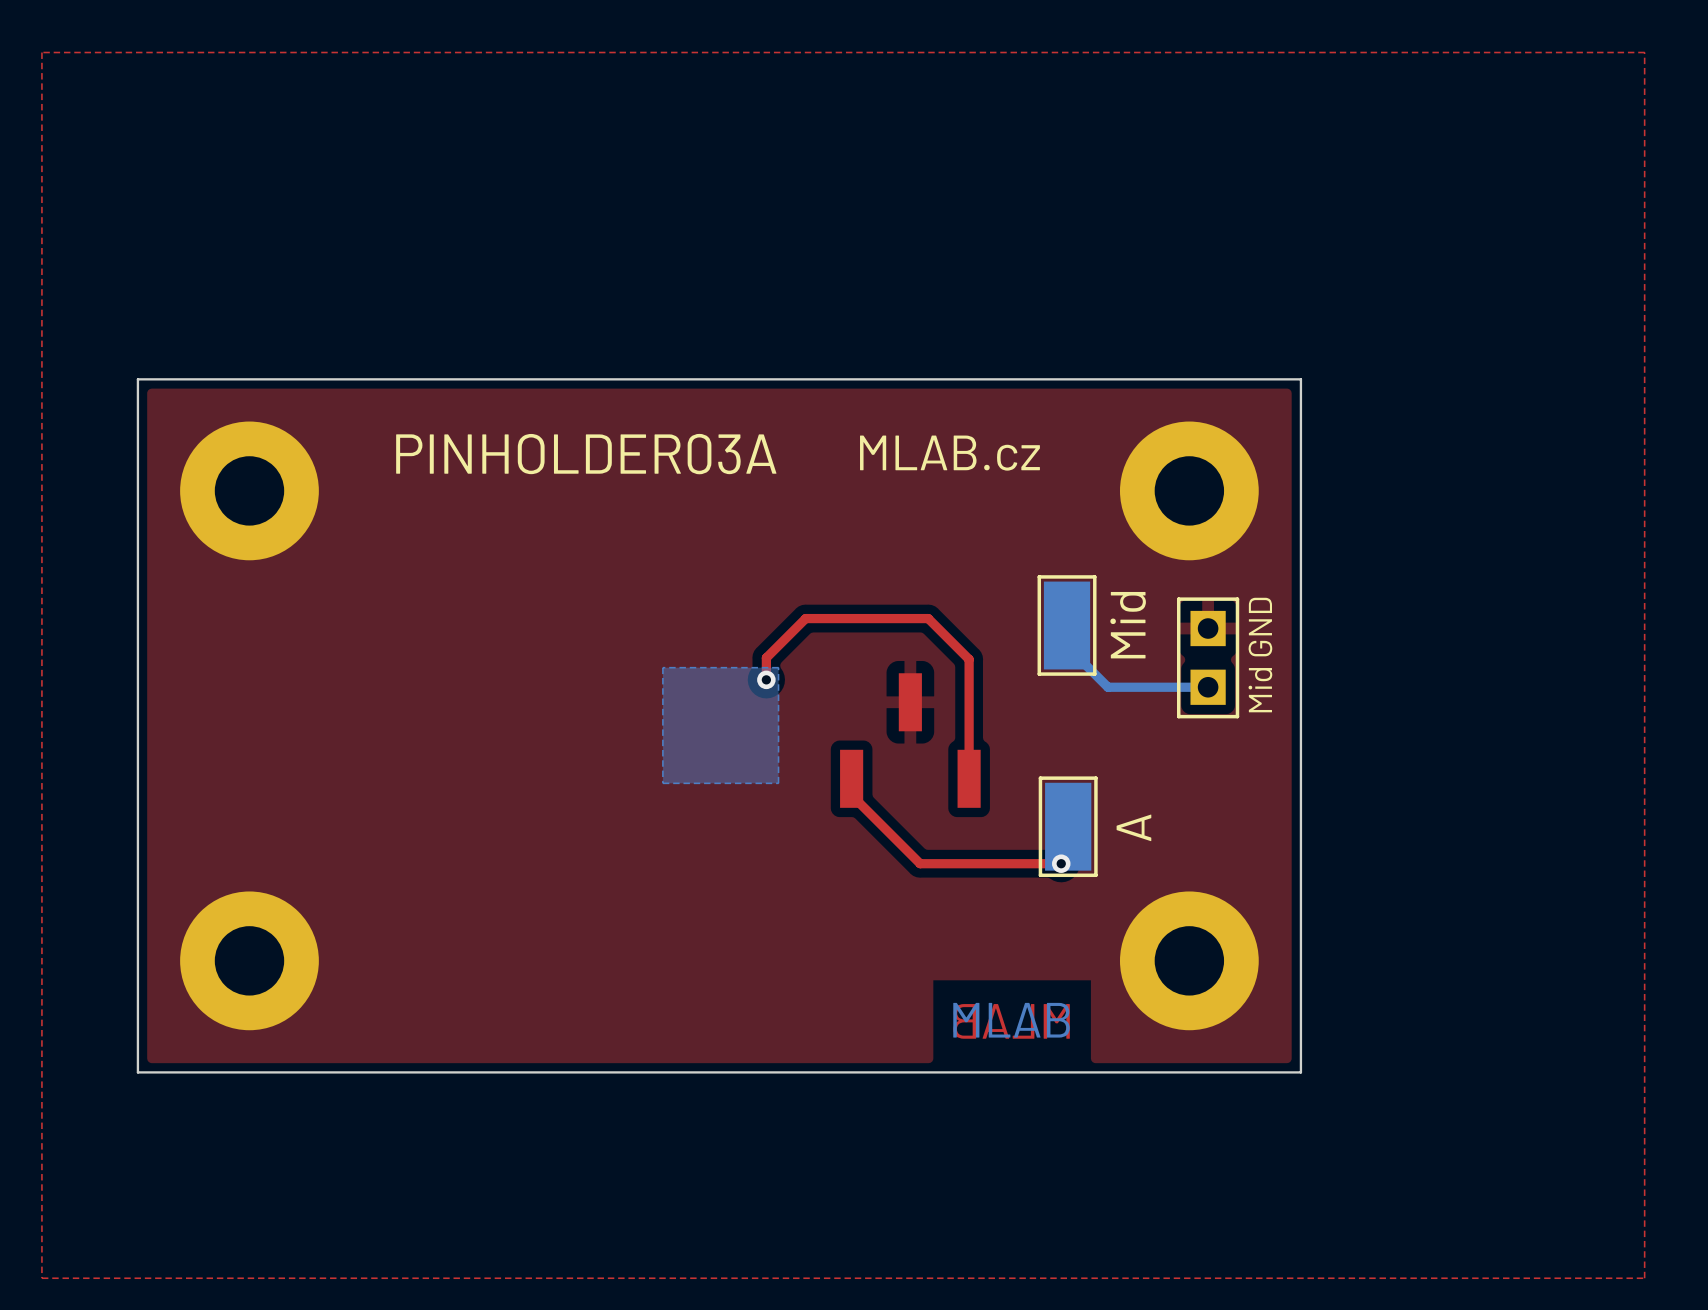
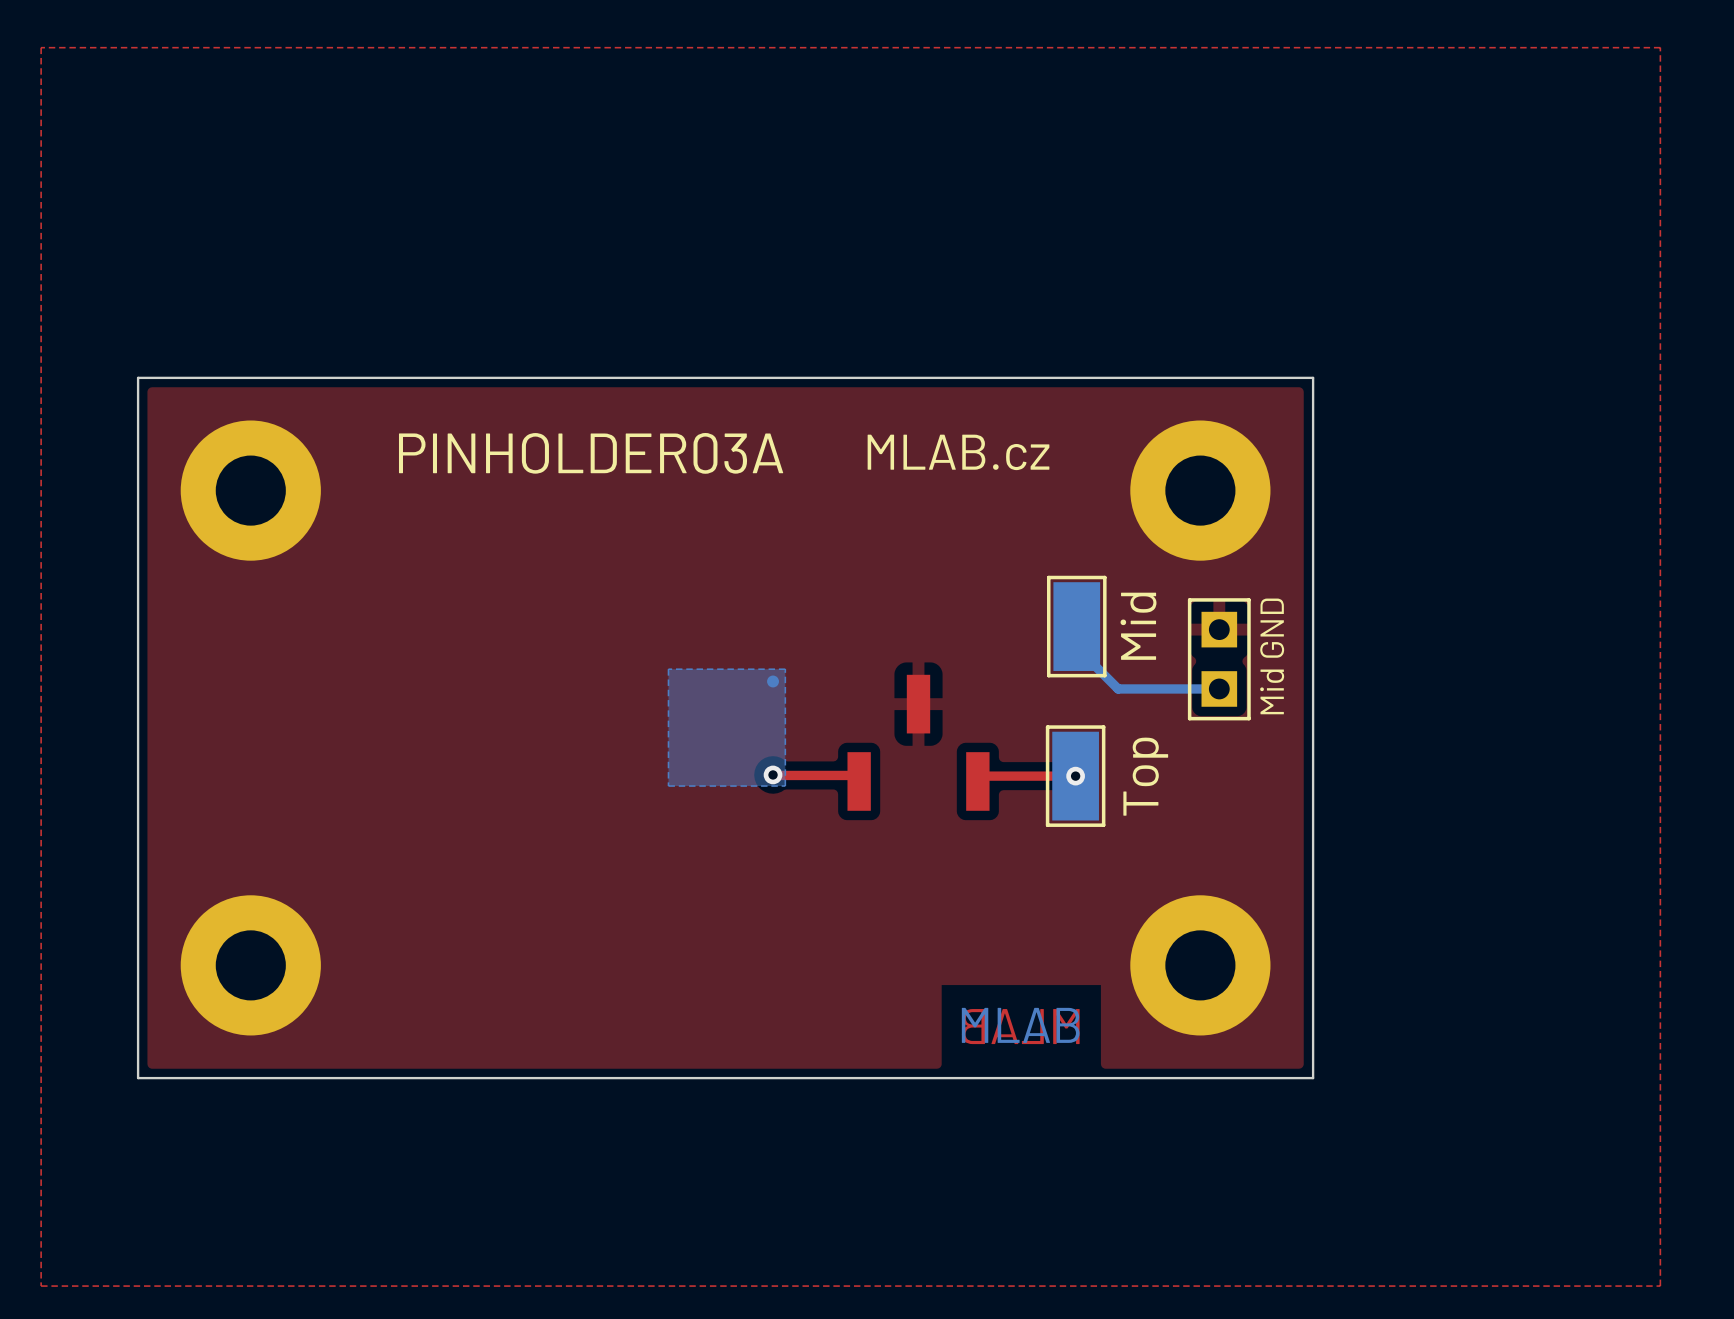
top track: (766, 679) (766, 657) (805, 618) (928, 618) (969, 659) (969, 778) -> none
via position: (766, 679) -> (773, 774)
top track: none -> (773, 774) (853, 775)
top track: none -> (1075, 776) (983, 776)
text: none -> Top (1145, 776)
top track: (851, 778) (851, 795) (920, 863) (1061, 863) -> none
part position: (1068, 826) -> (1075, 776)
text: A (1133, 827) -> none
via position: (1061, 863) -> (1075, 776)

